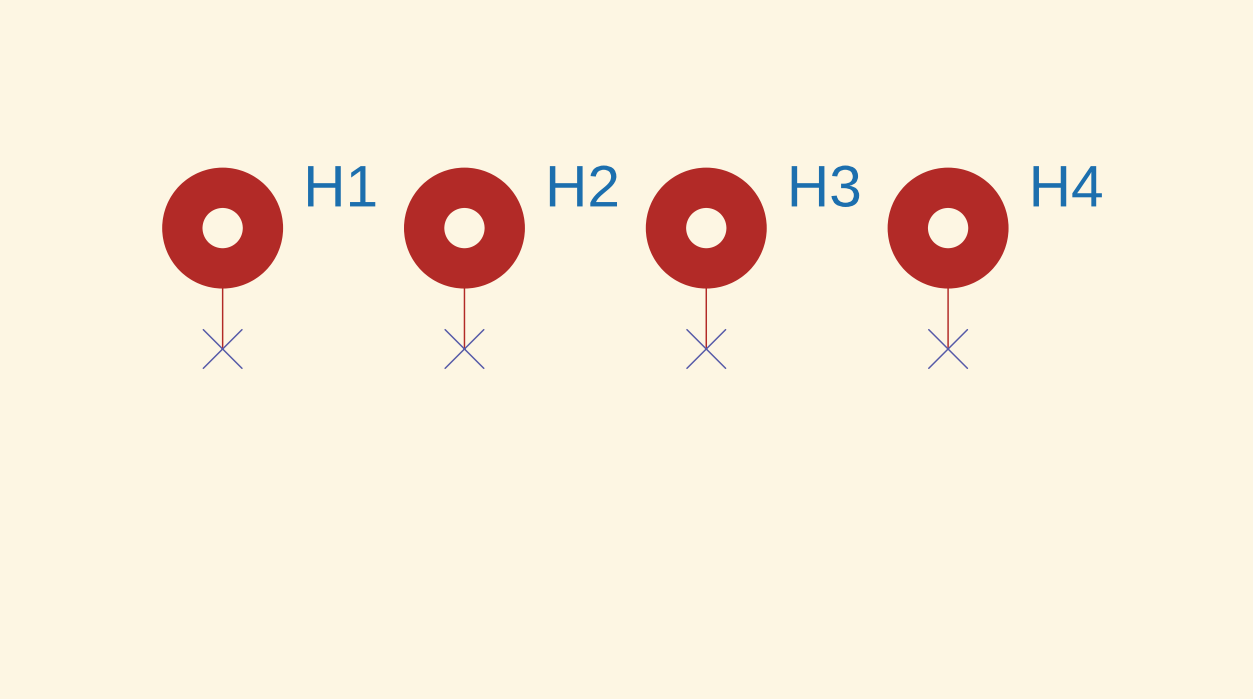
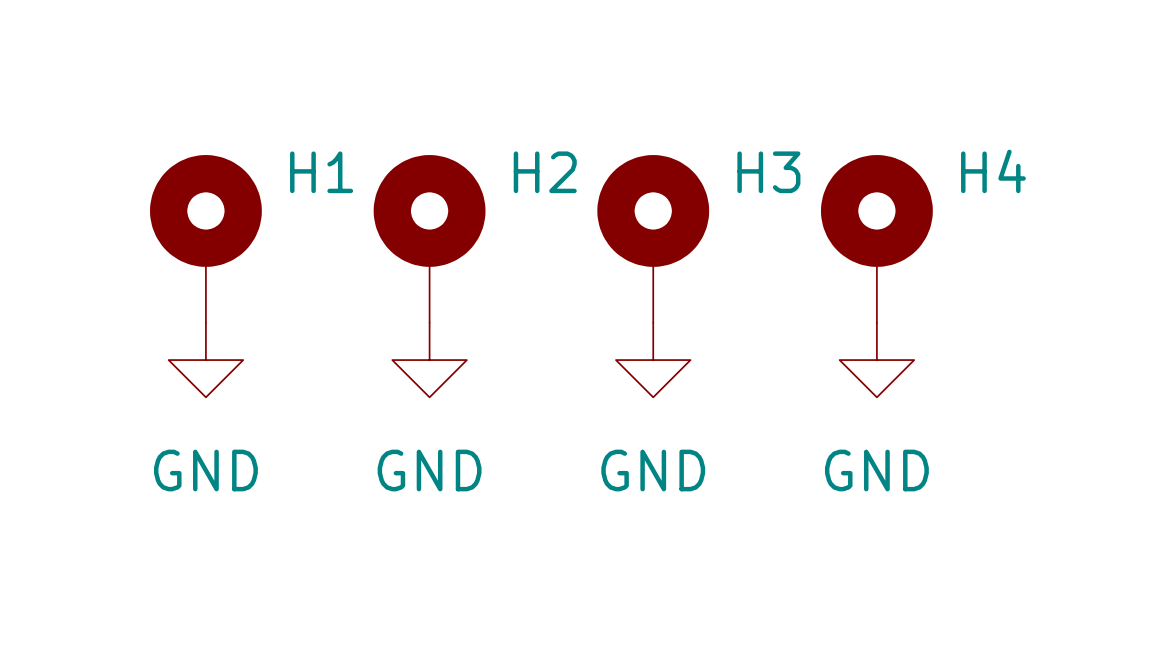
no-connect mark: (222, 348) -> none
no-connect mark: (464, 348) -> none
no-connect mark: (706, 348) -> none
no-connect mark: (948, 348) -> none
power symbol: none -> GND (205, 360)
power symbol: none -> GND (429, 360)
power symbol: none -> GND (653, 360)
power symbol: none -> GND (876, 360)

